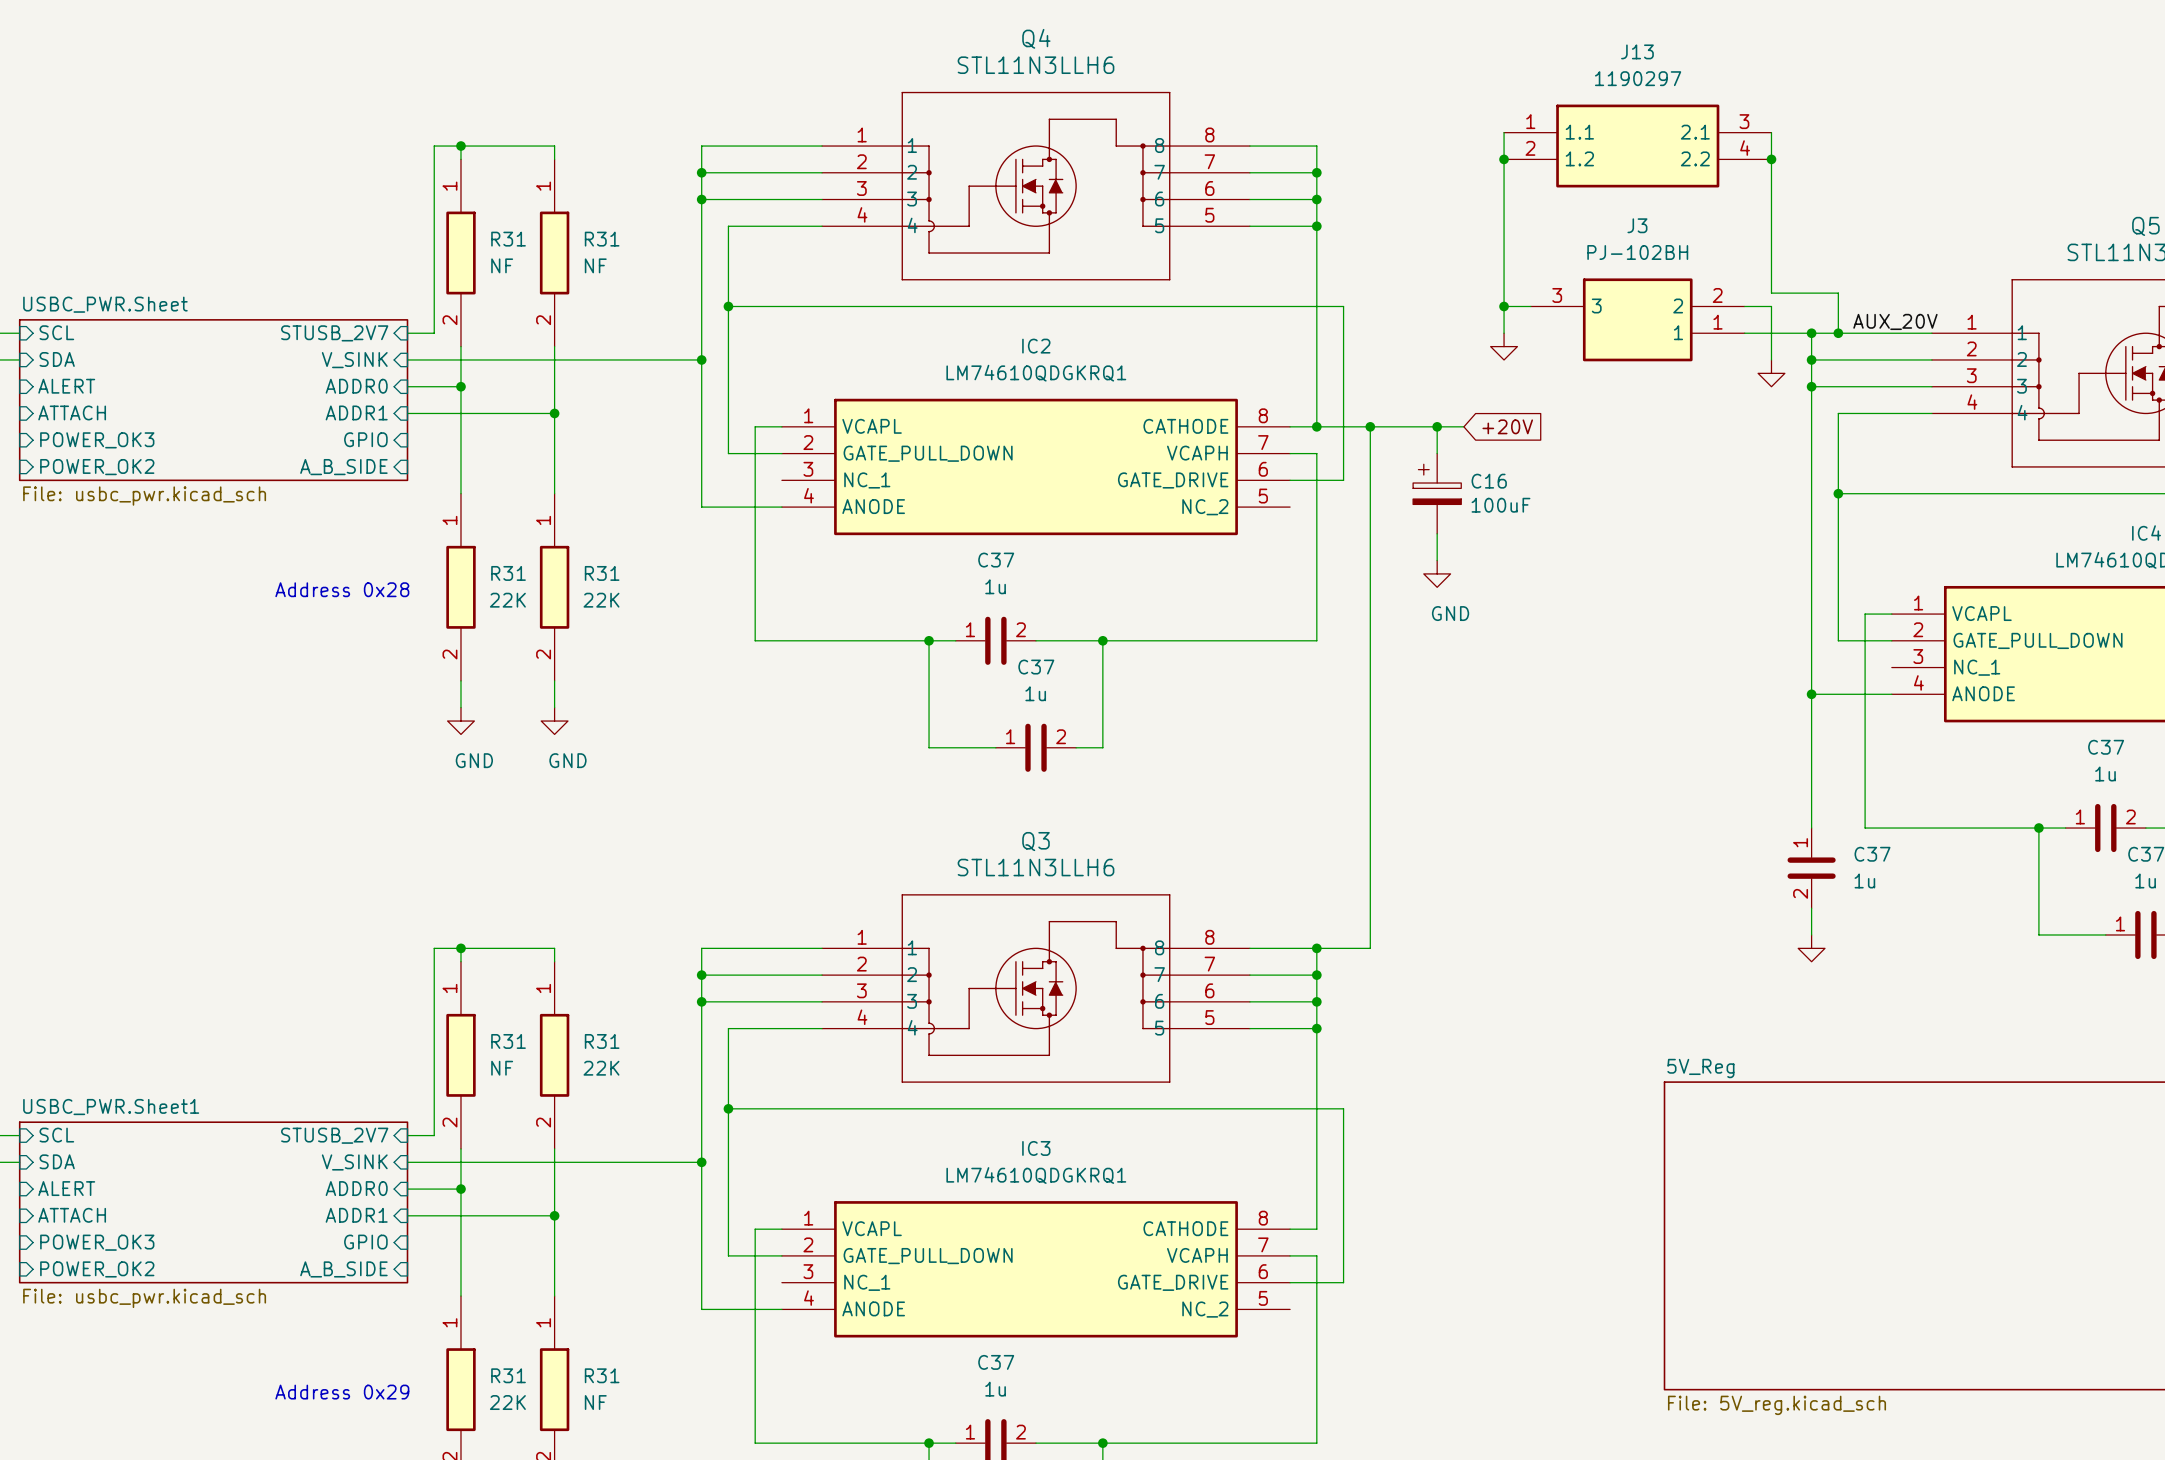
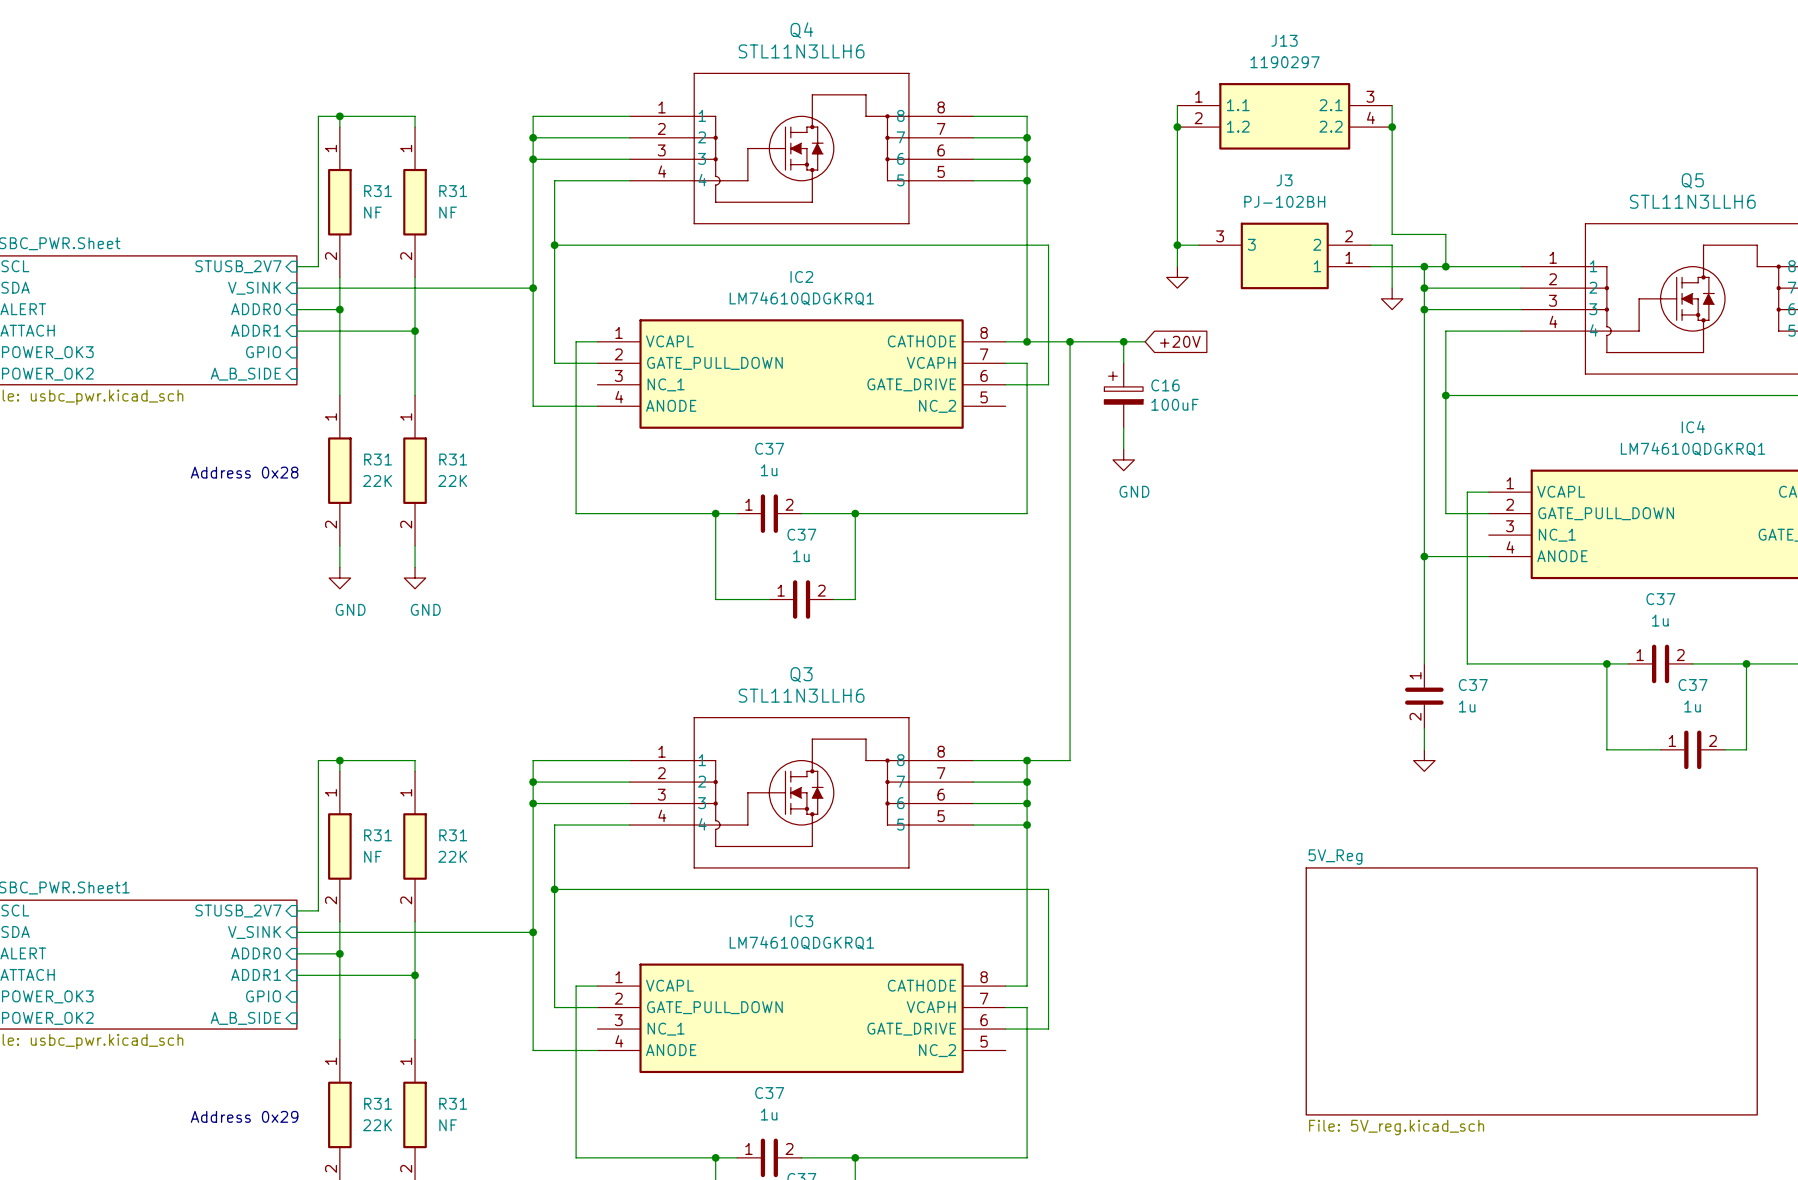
label: AUX_20V (1895, 321) -> none

